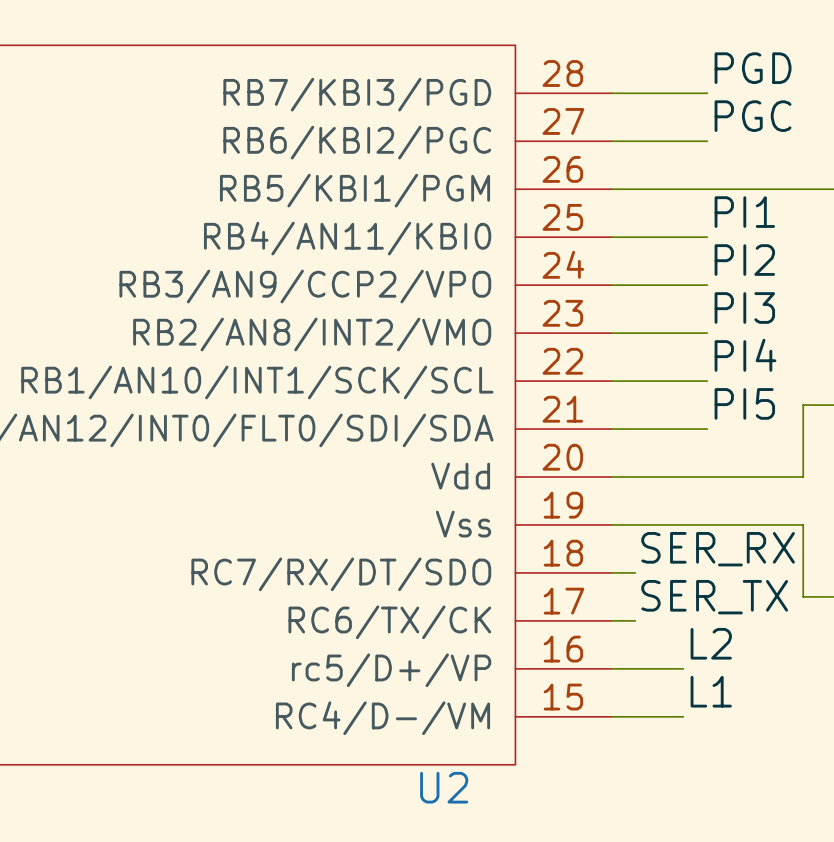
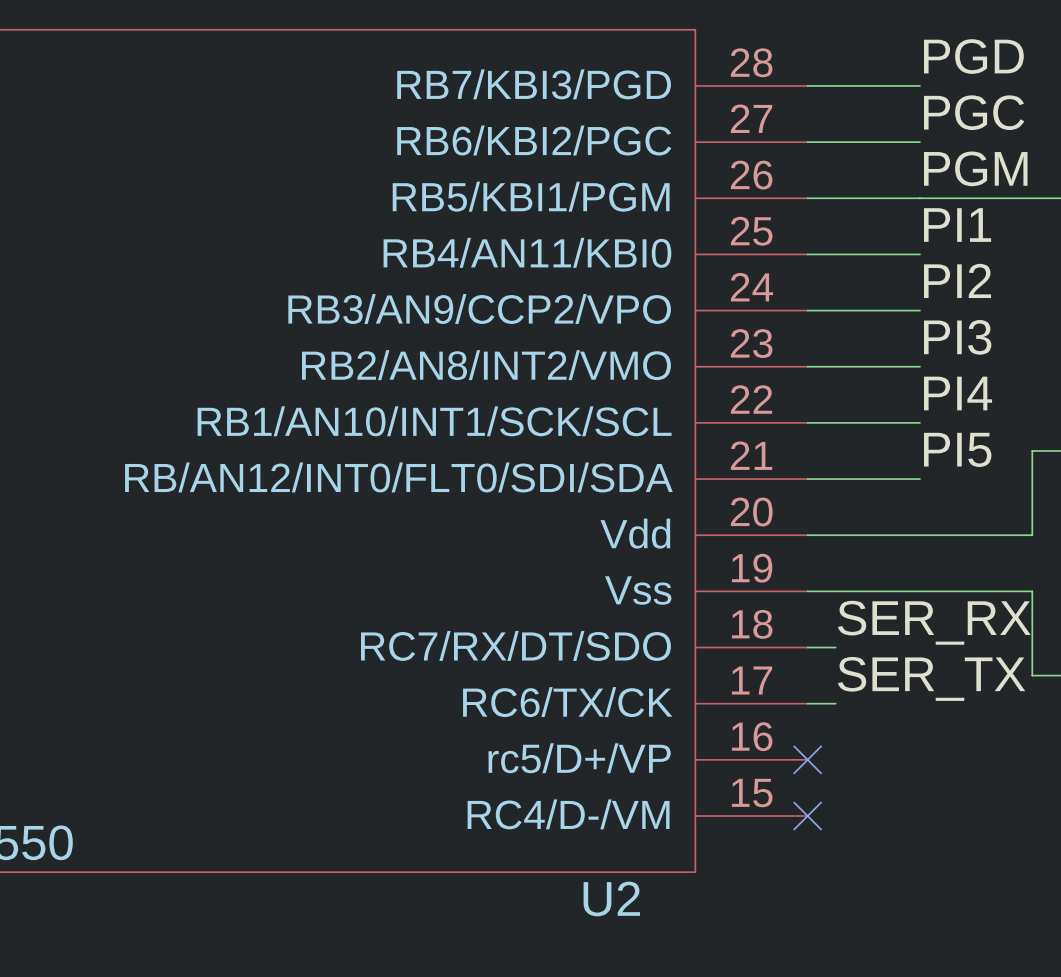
label: none -> PGM (975, 168)
label: L2 (711, 643) -> none
wire: (611, 668) (683, 668) -> none
no-connect mark: none -> (807, 759)
label: L1 (711, 691) -> none
wire: (611, 716) (683, 716) -> none
no-connect mark: none -> (807, 816)

